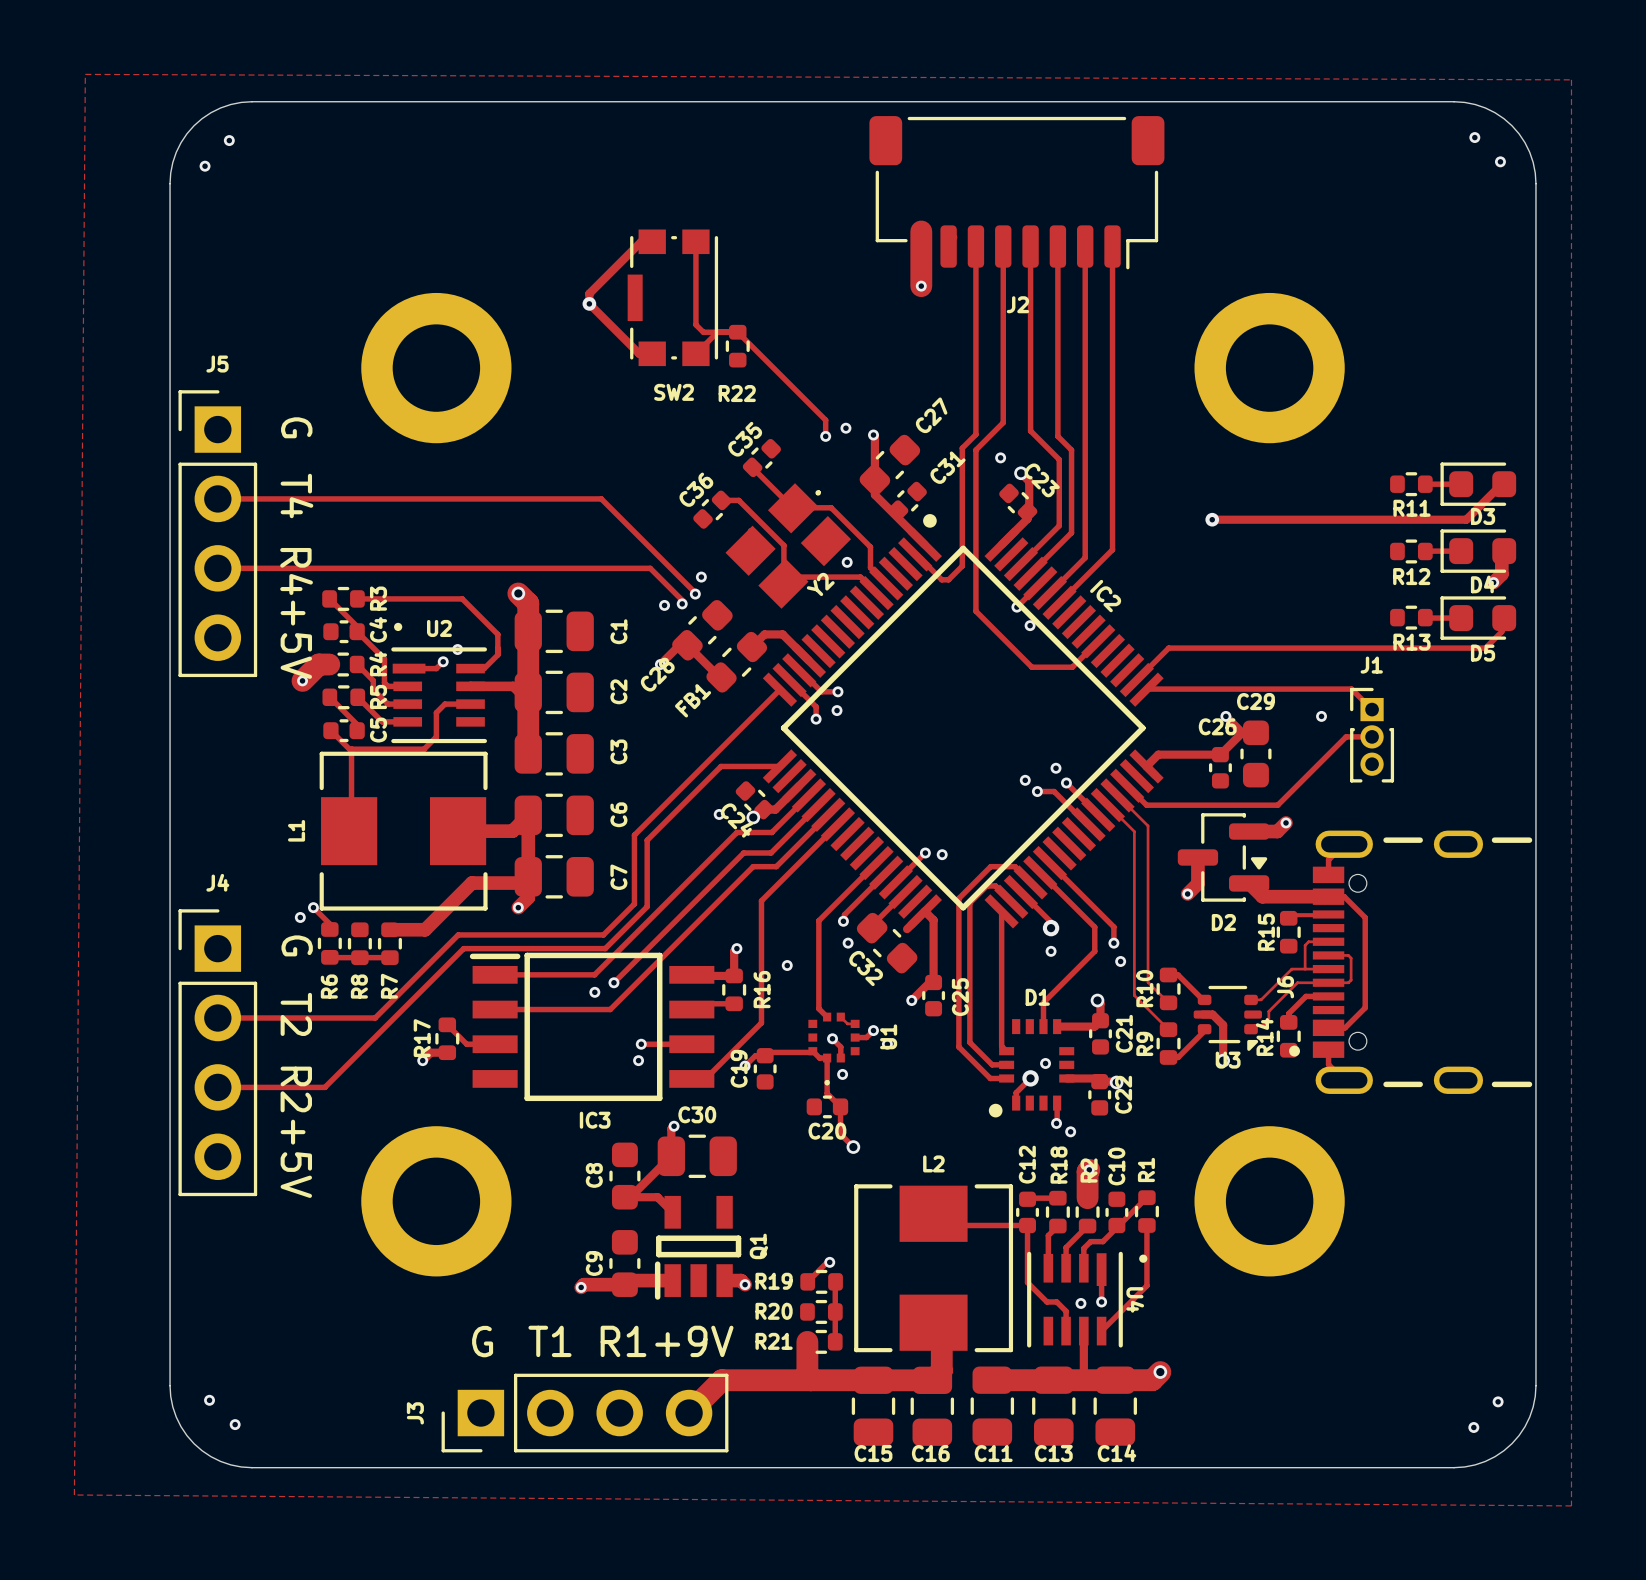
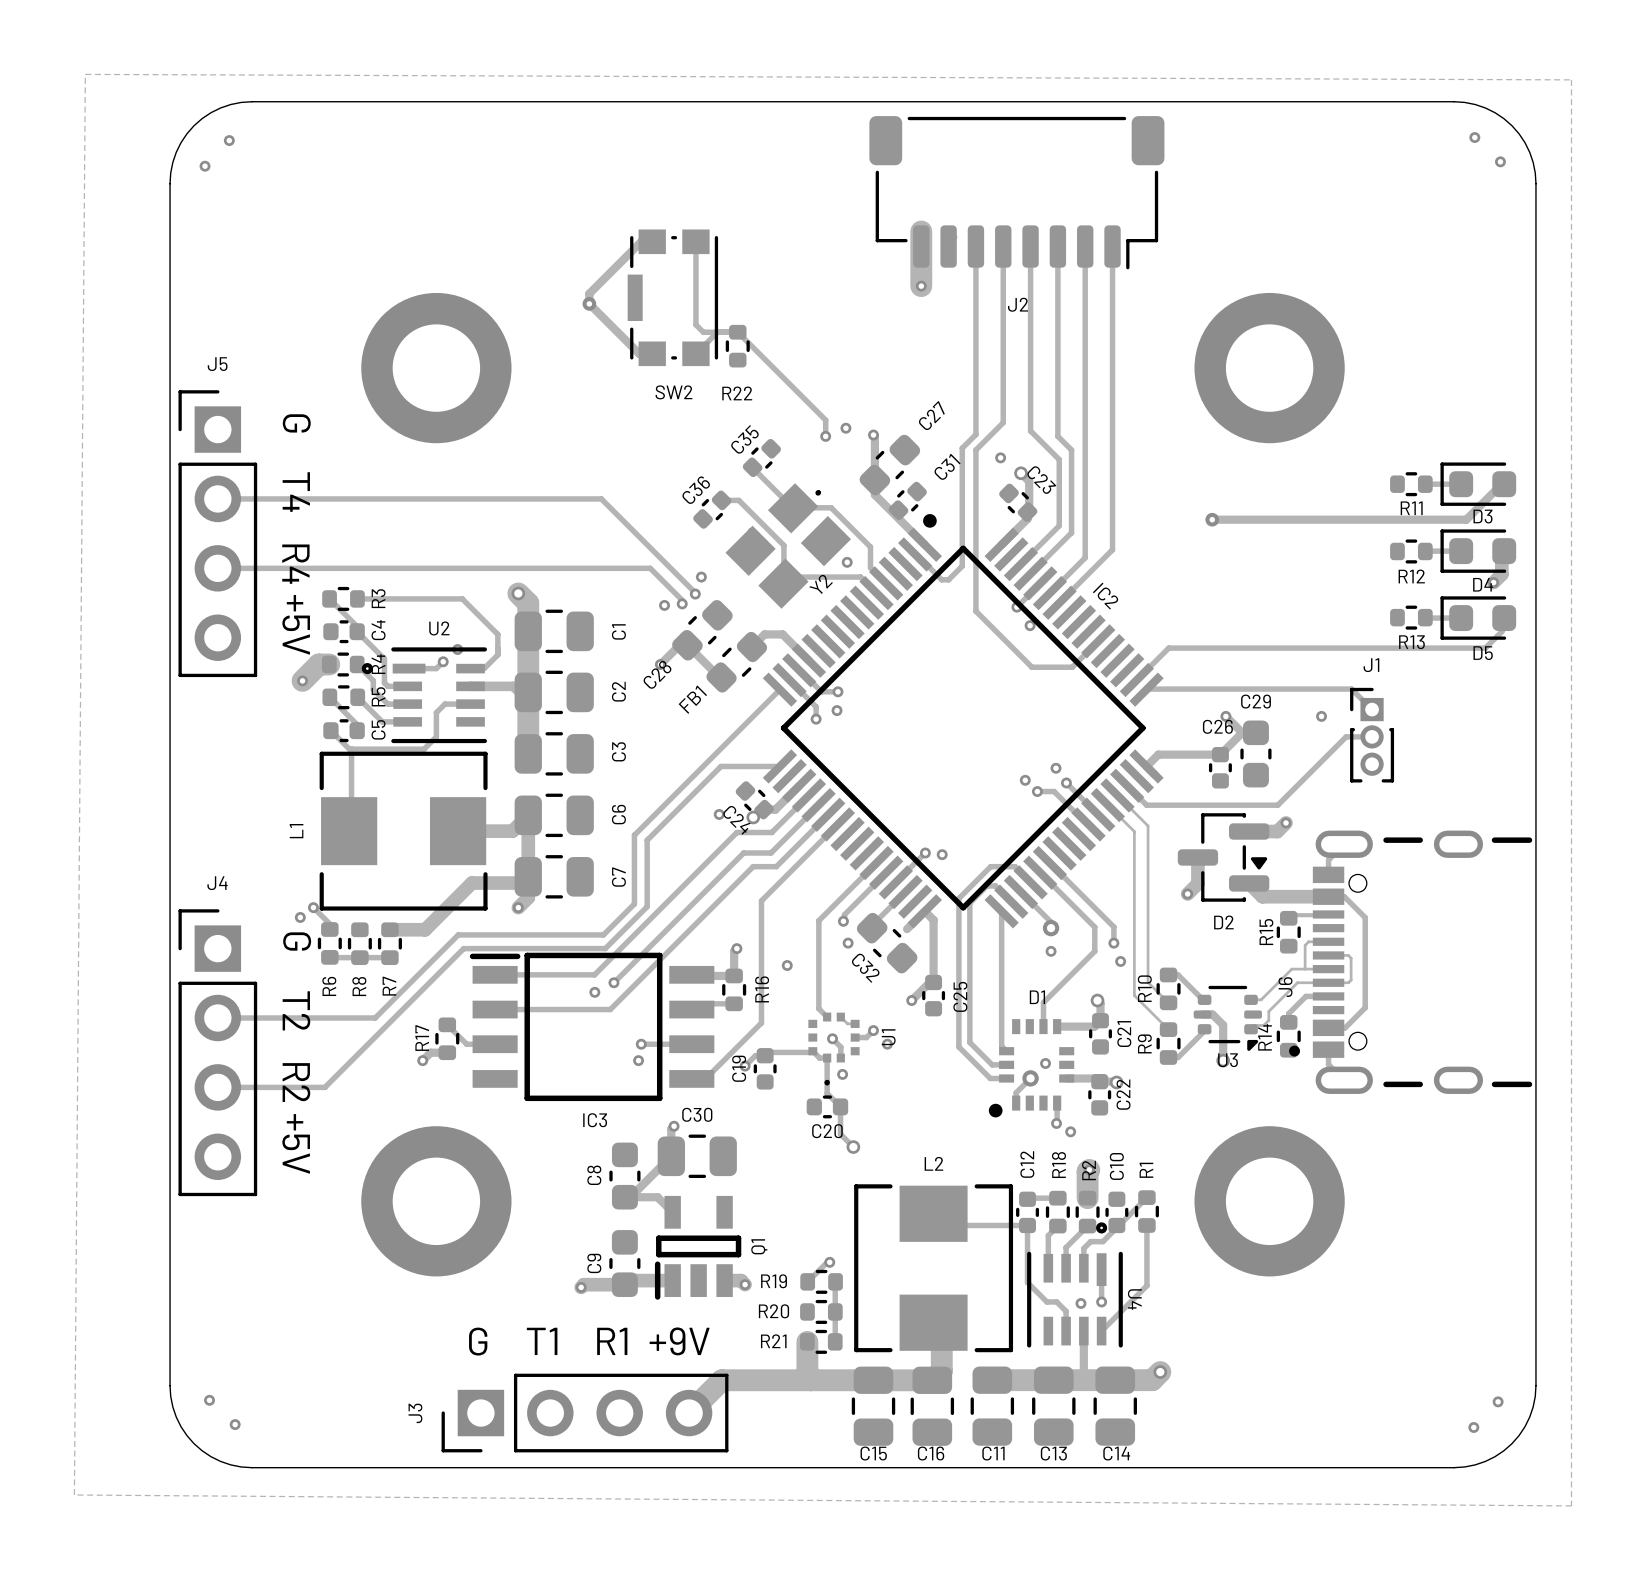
U2 footprint: [391, 622, 487, 744] -> [361, 647, 487, 744]
U4 footprint: [1027, 1251, 1148, 1348] -> [1027, 1222, 1123, 1348]

